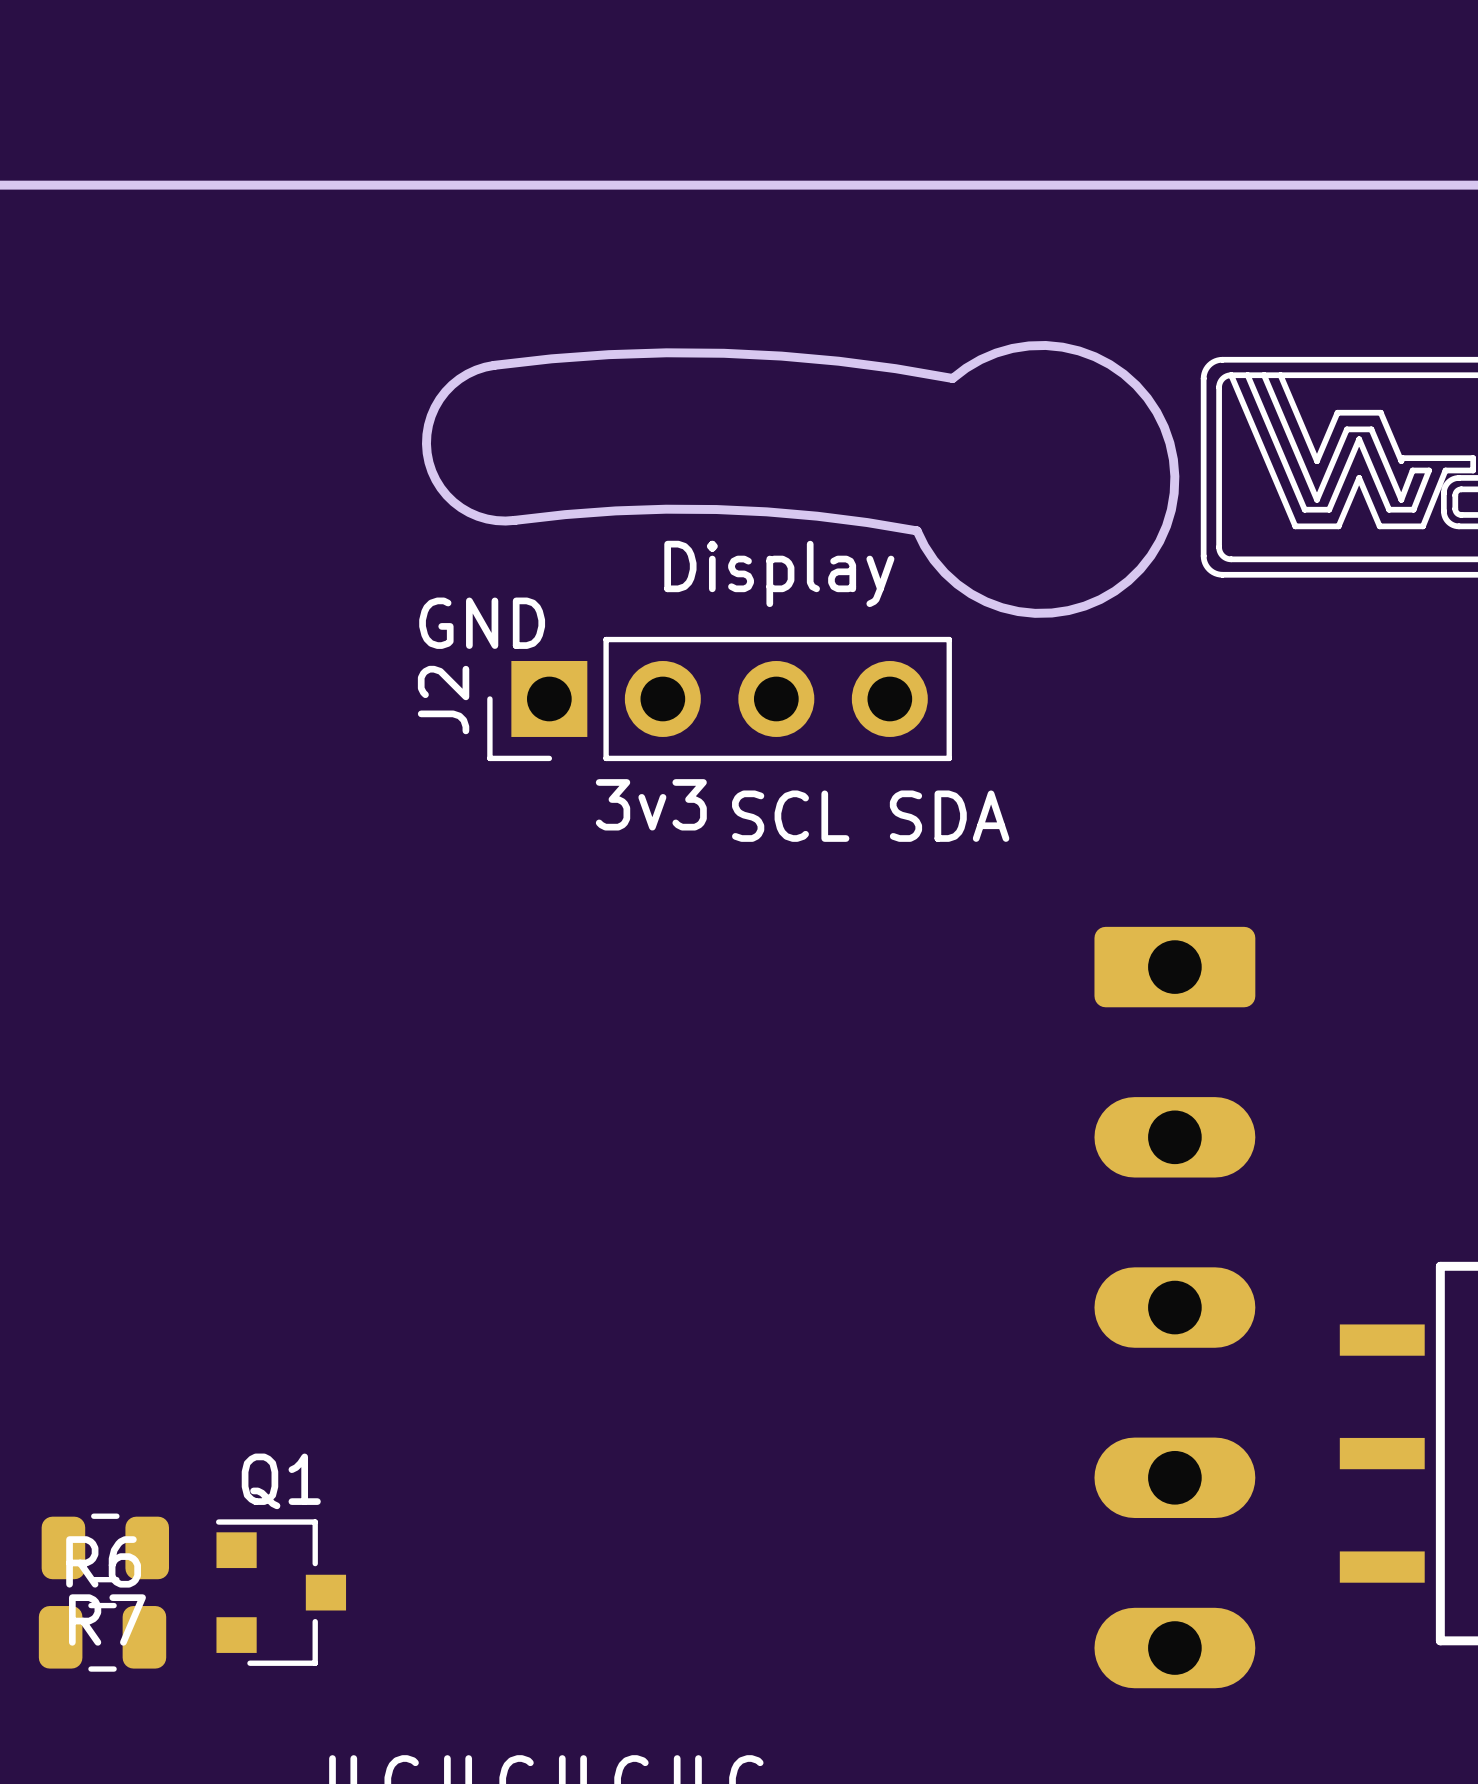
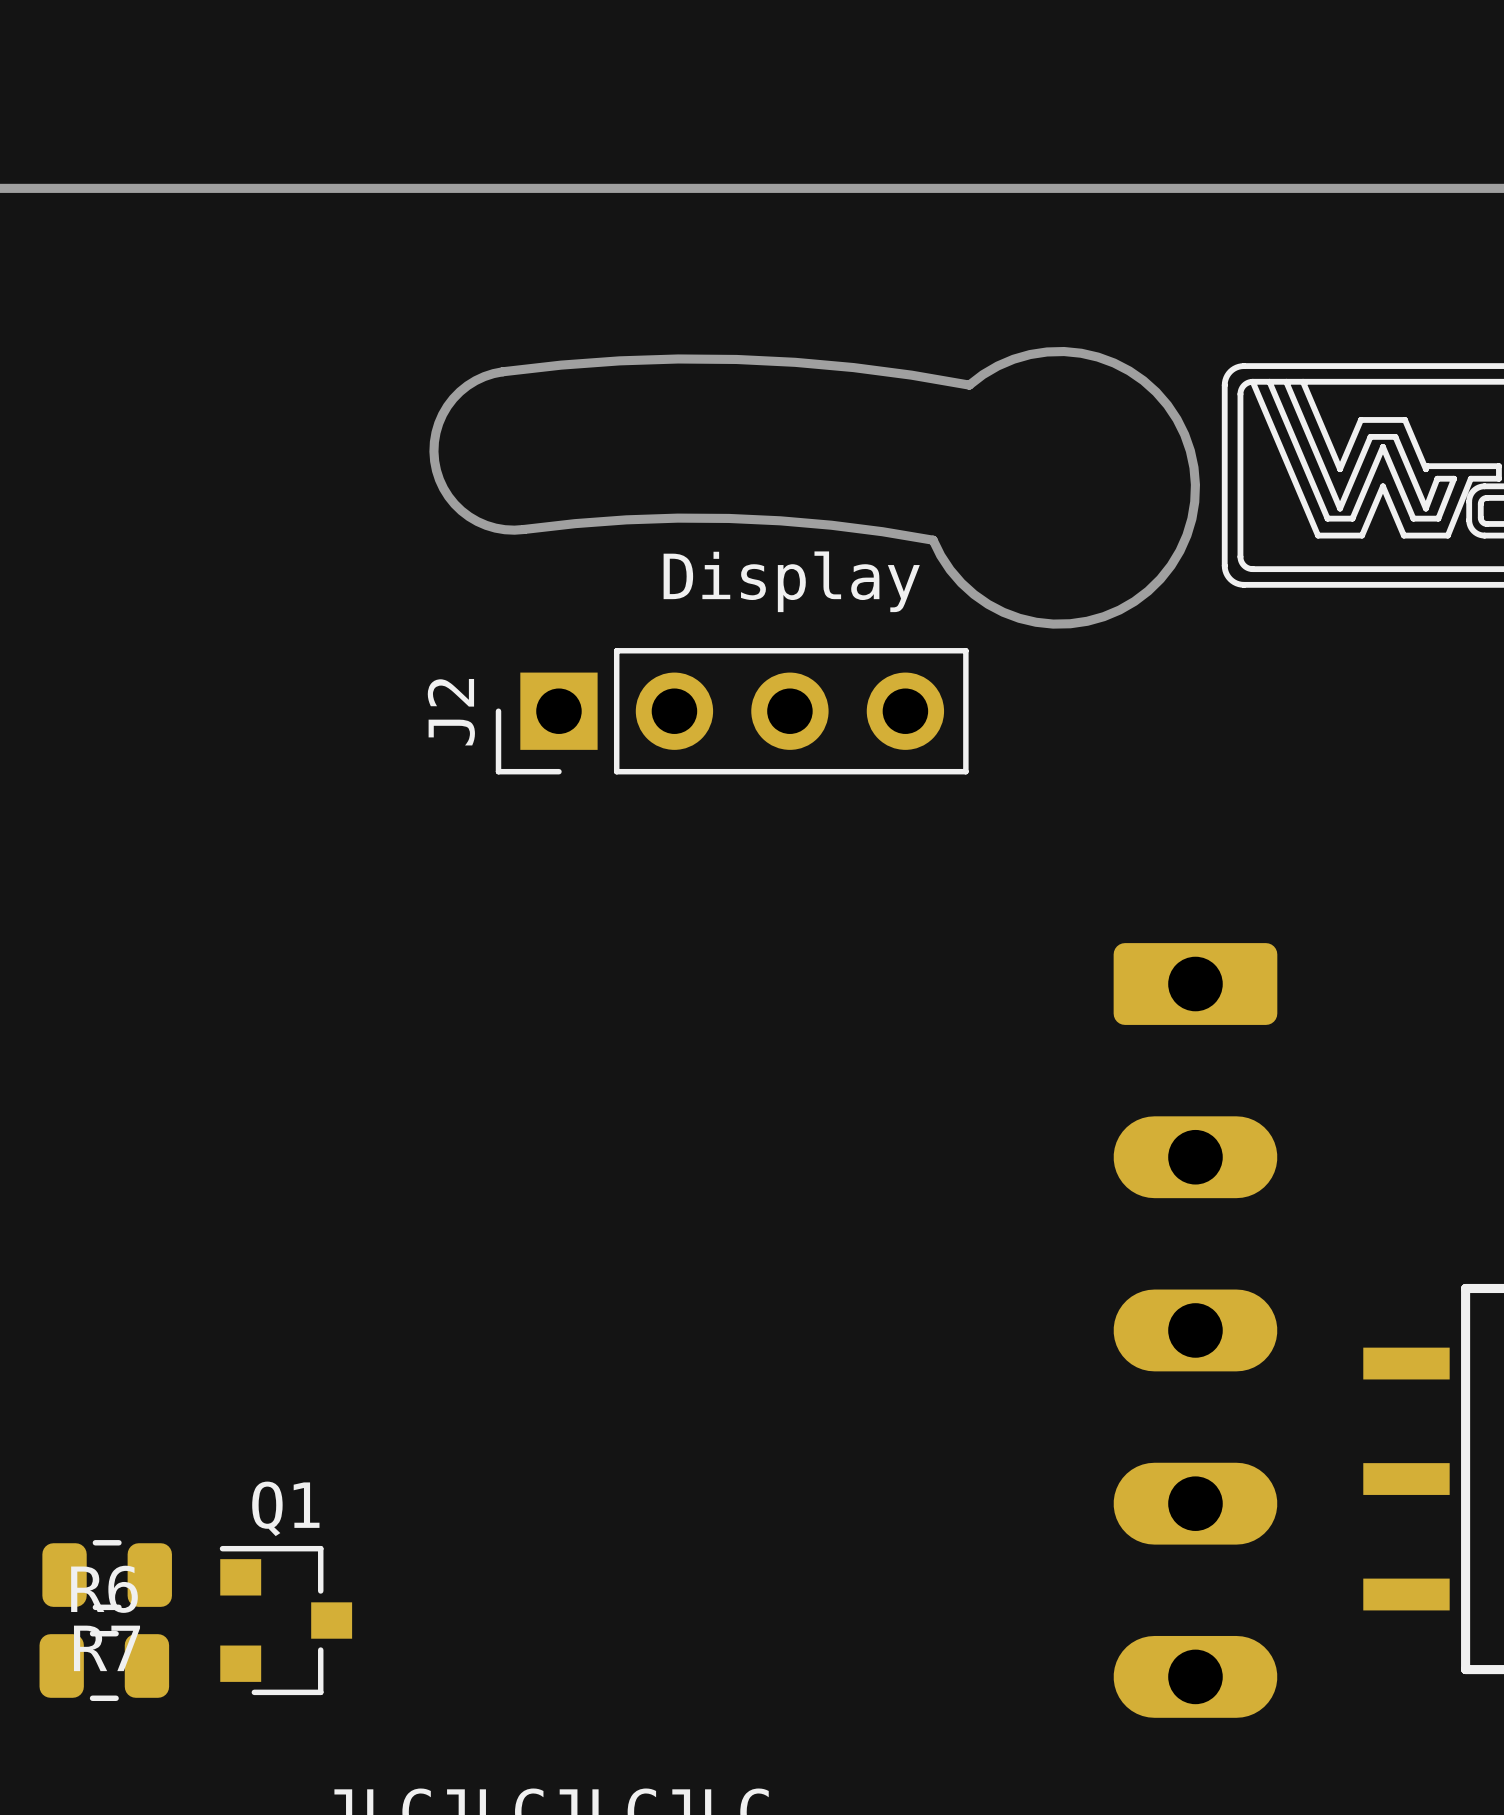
text: GND (482, 623) -> none
text: 3v3 (651, 804) -> none
text: SCL (790, 816) -> none
text: SDA (949, 816) -> none

